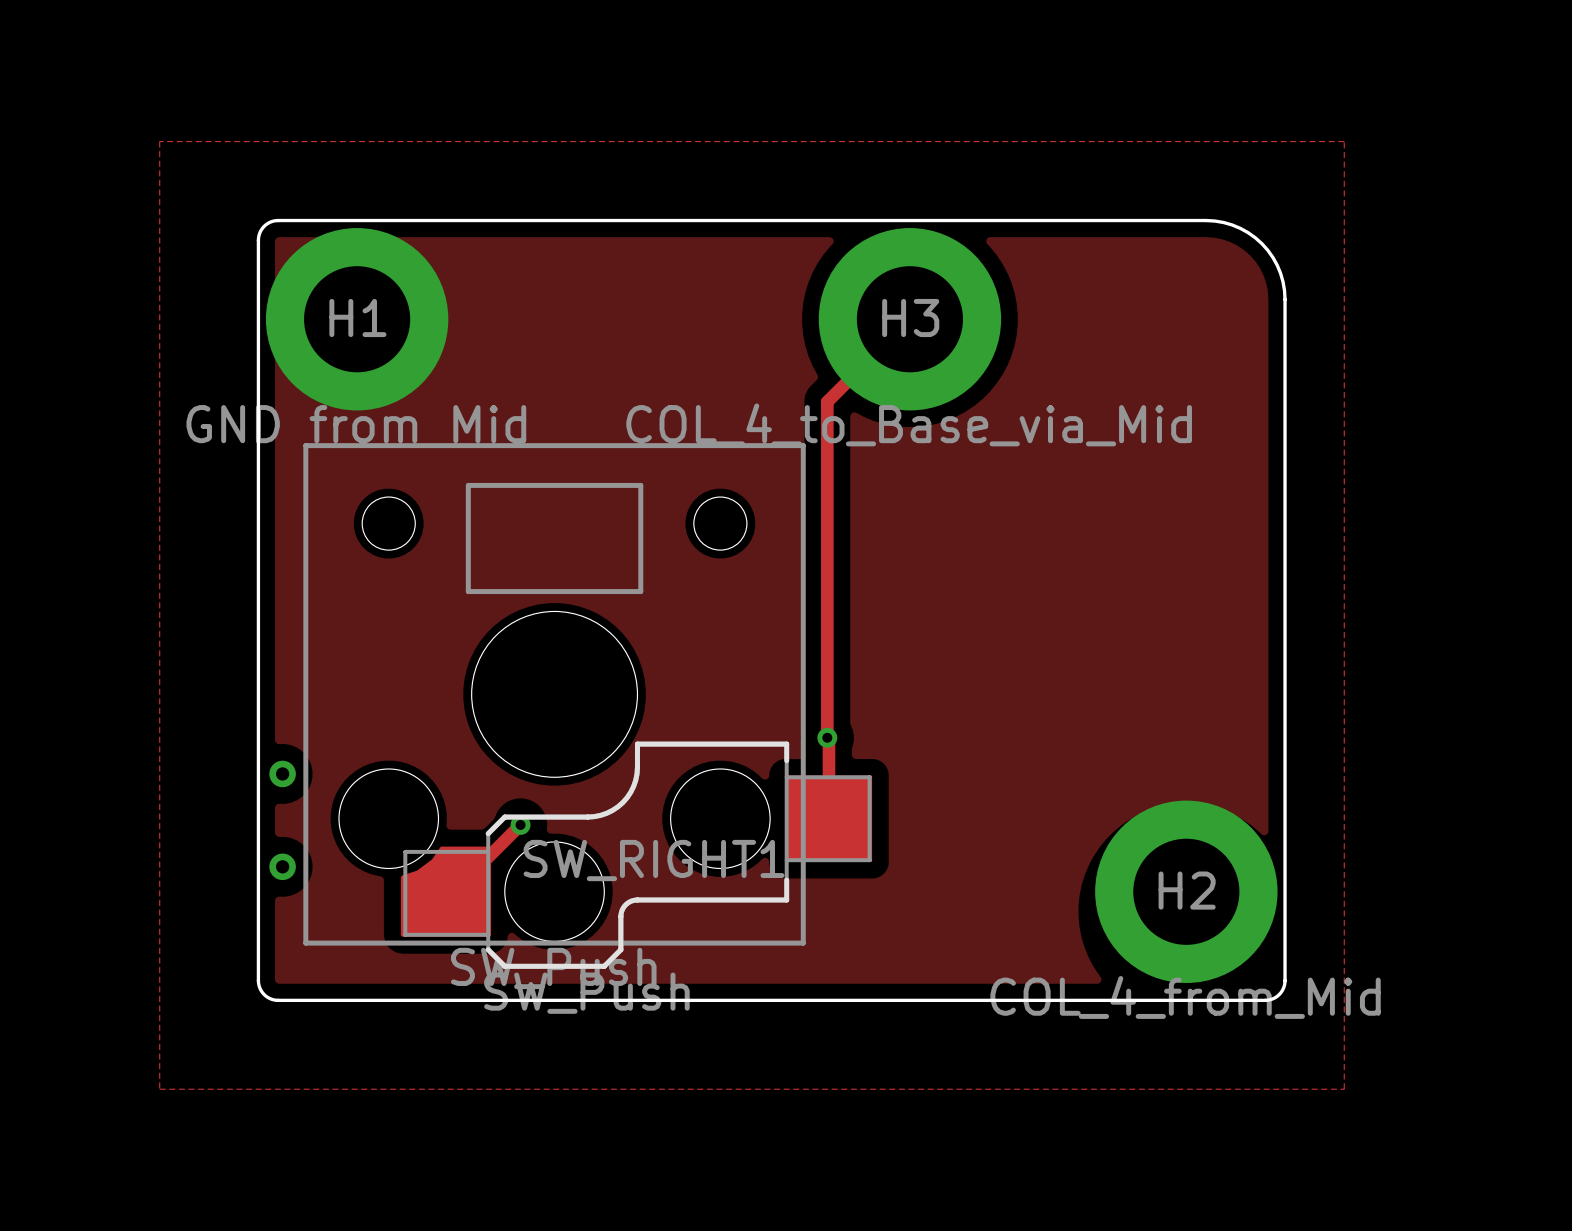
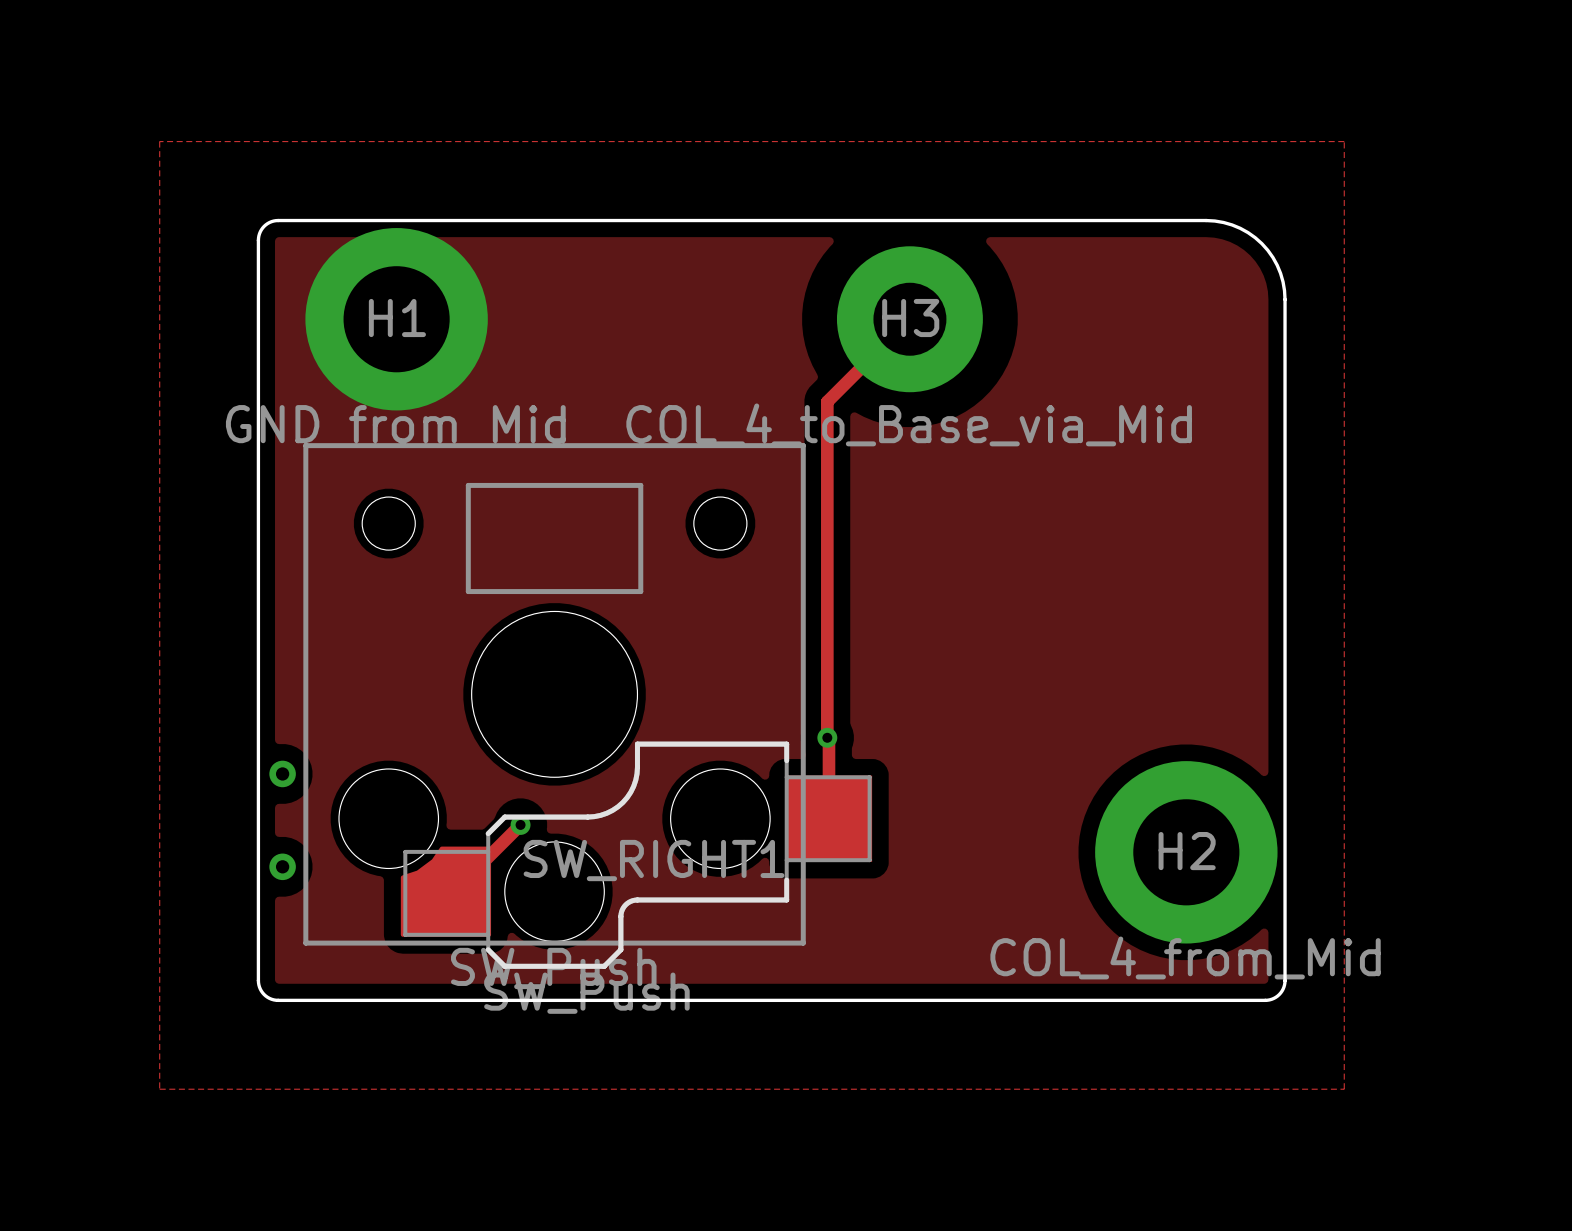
H3 footprint: [818, 228, 1002, 411] -> [836, 246, 983, 393]
H1 position: (357, 319) -> (396, 319)
H2 position: (1186, 891) -> (1186, 852)

